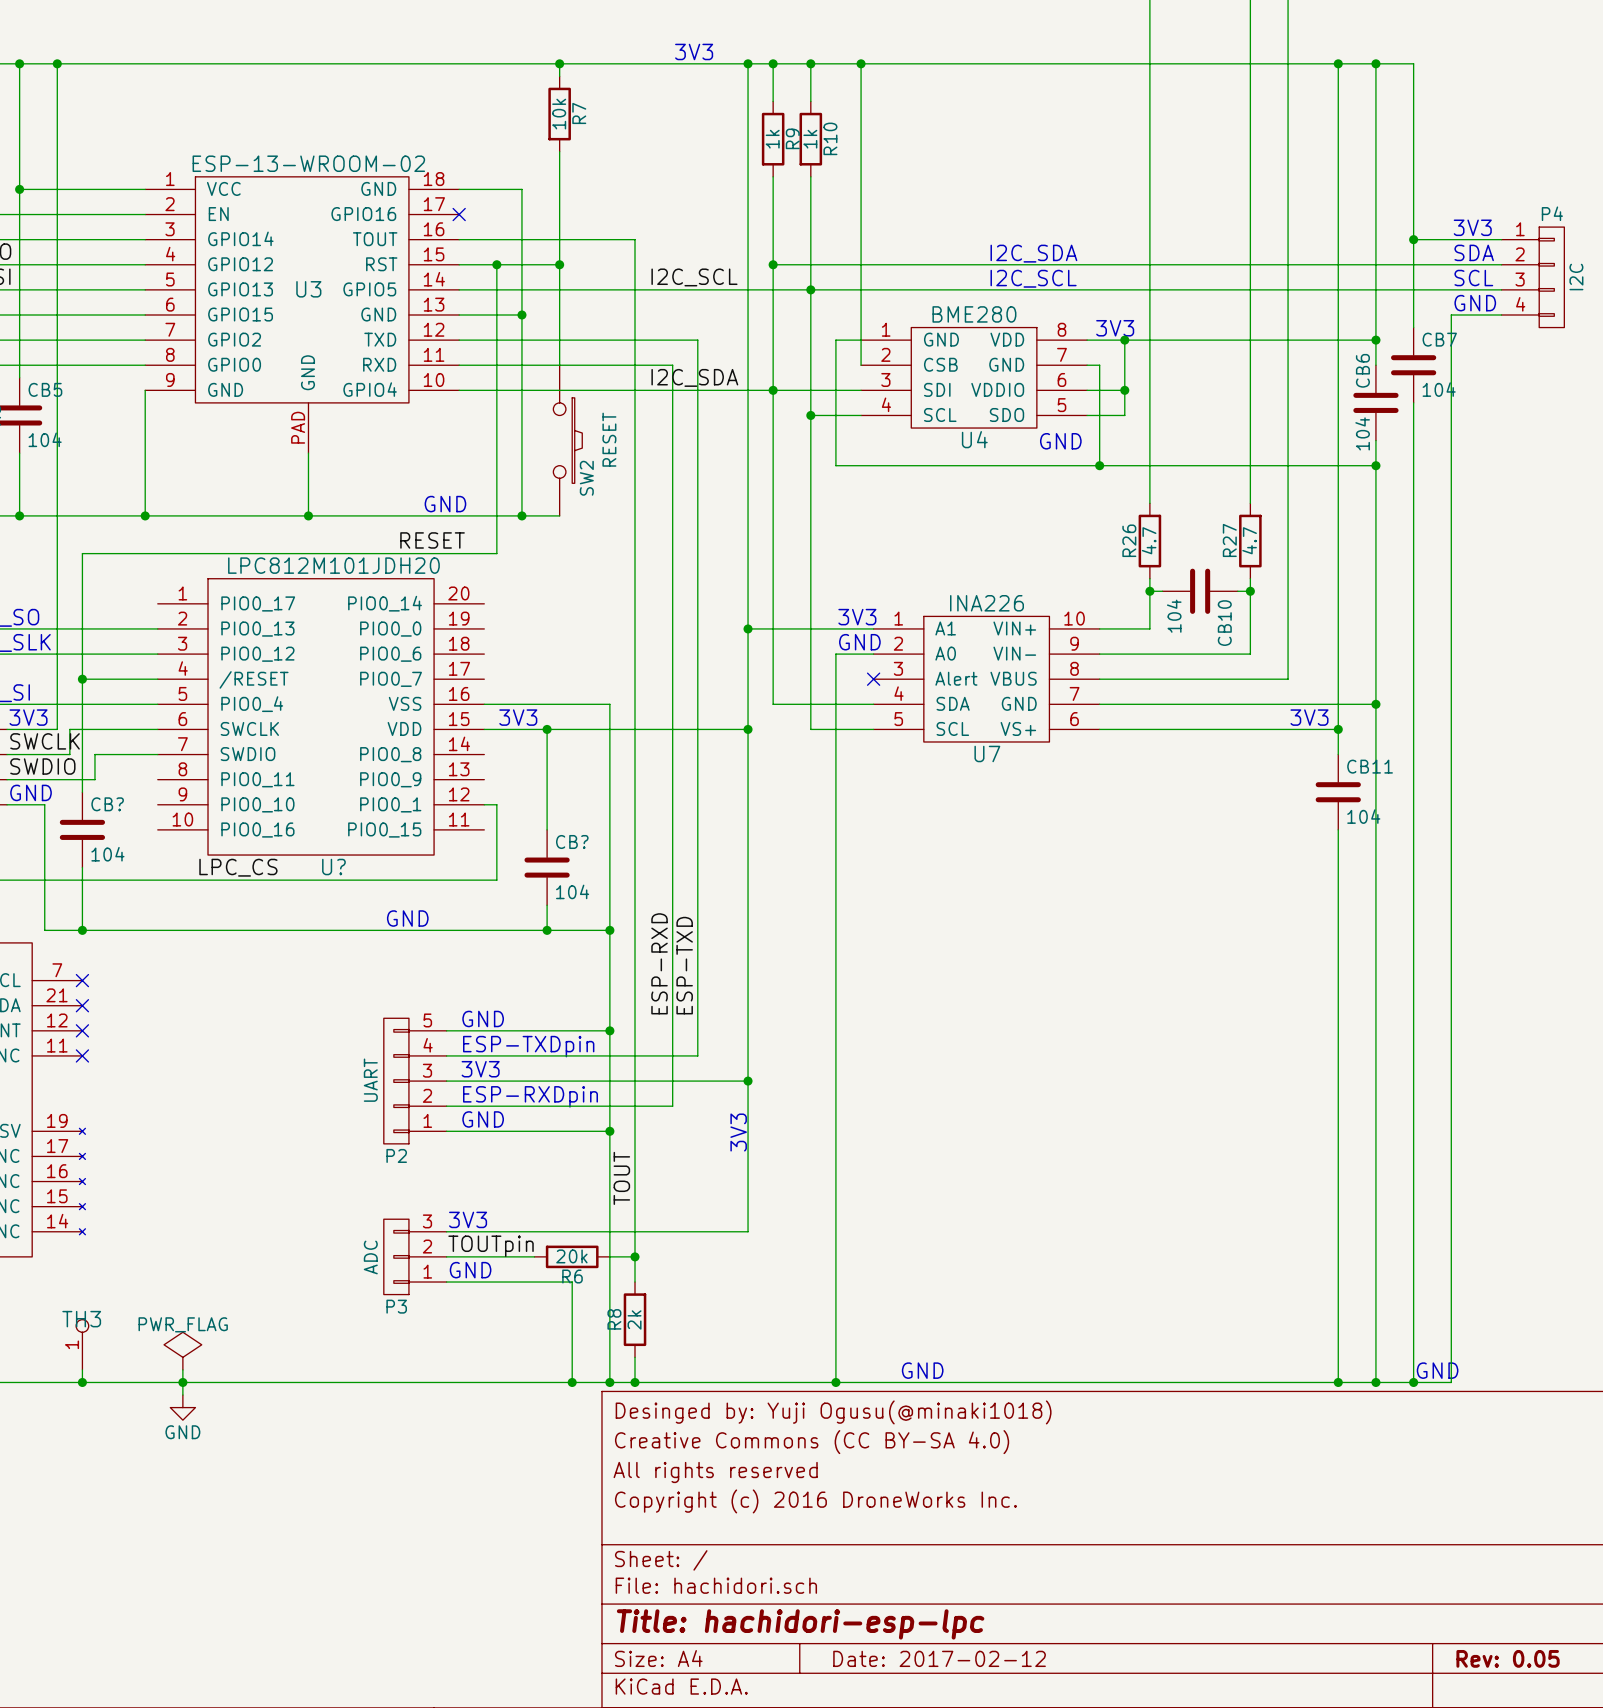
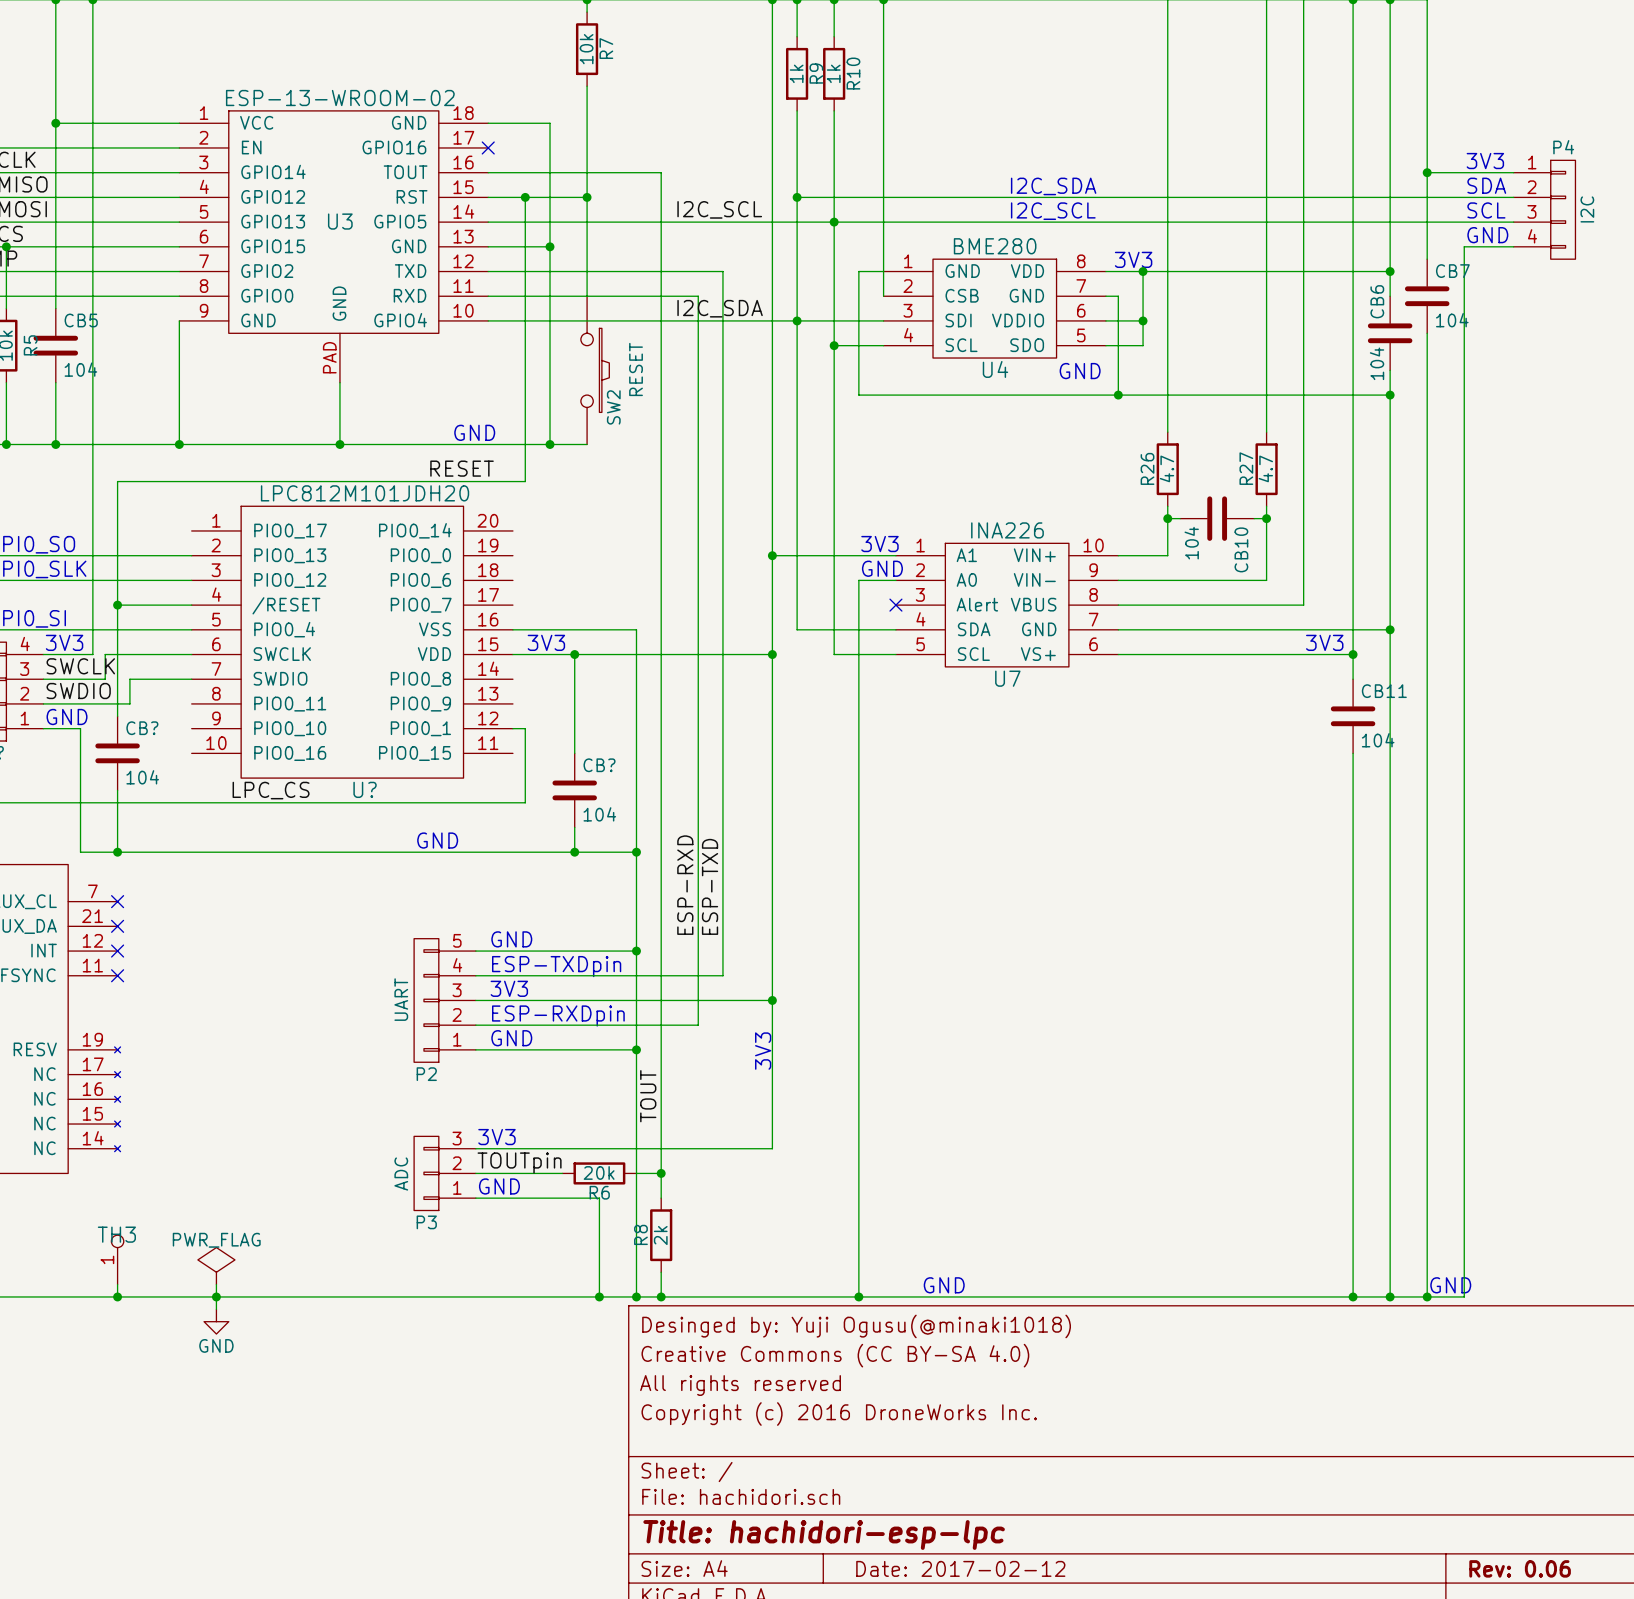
title block: Rev: 0.05 (1508, 1658) -> Rev: 0.06 (1520, 1568)

